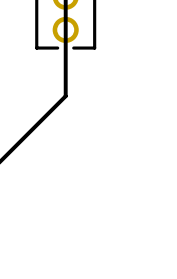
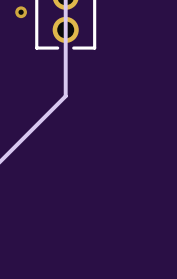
via: none -> (21, 12)

